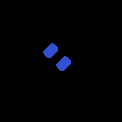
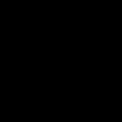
part: (57, 57) -> none

